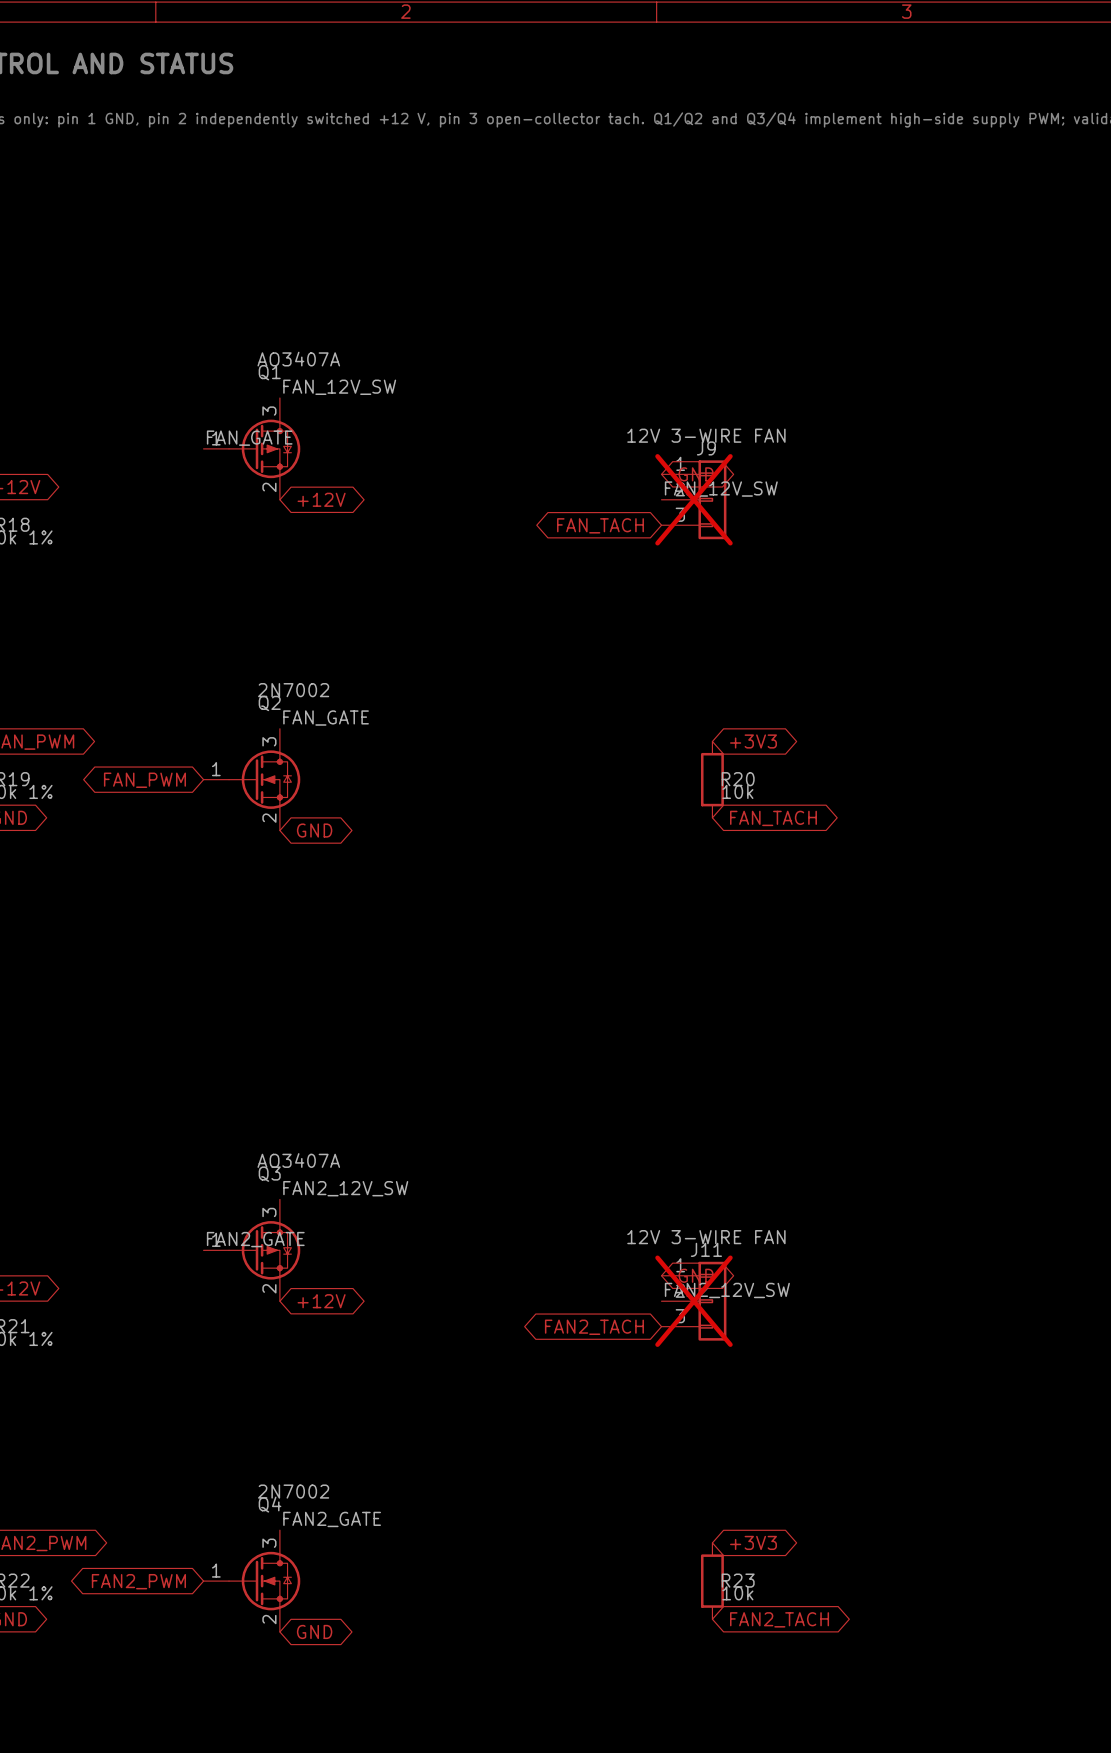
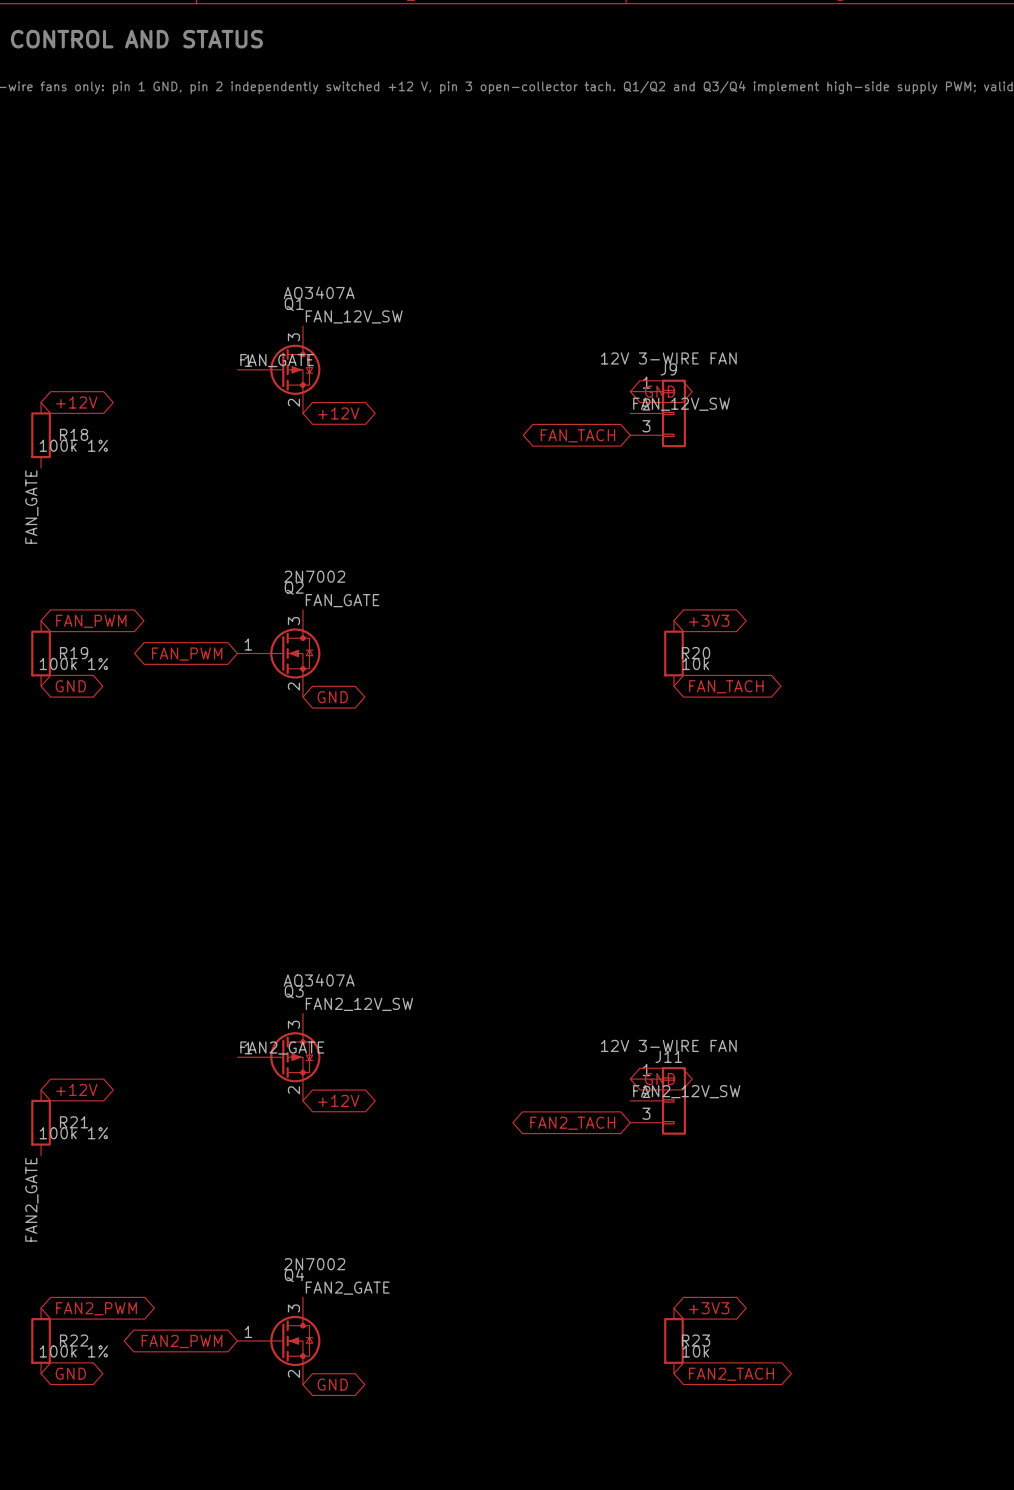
J9 do-not-place cross: (693, 499) -> none
J11 do-not-place cross: (693, 1301) -> none

